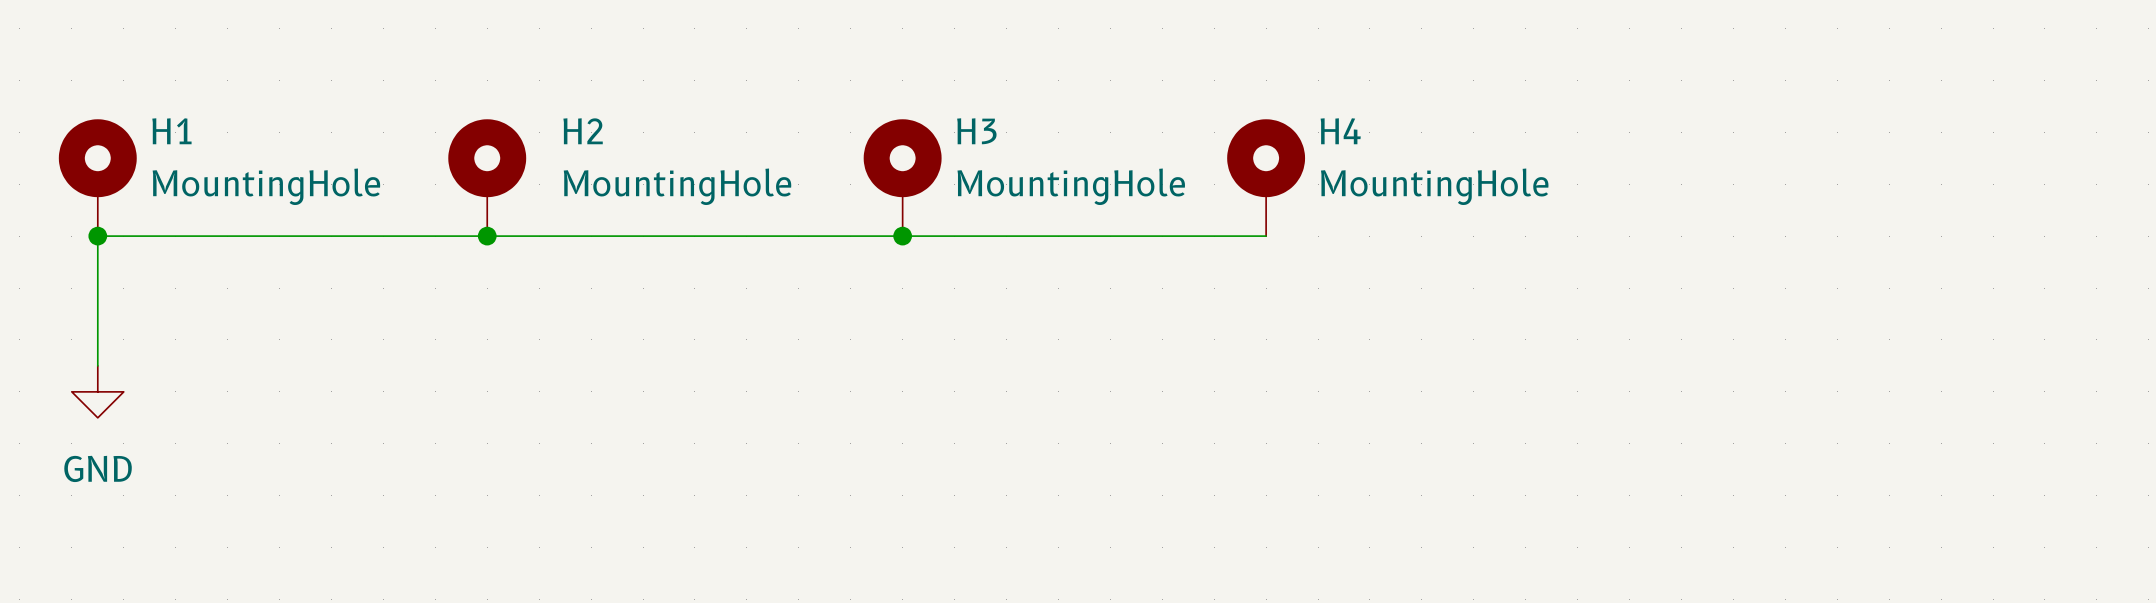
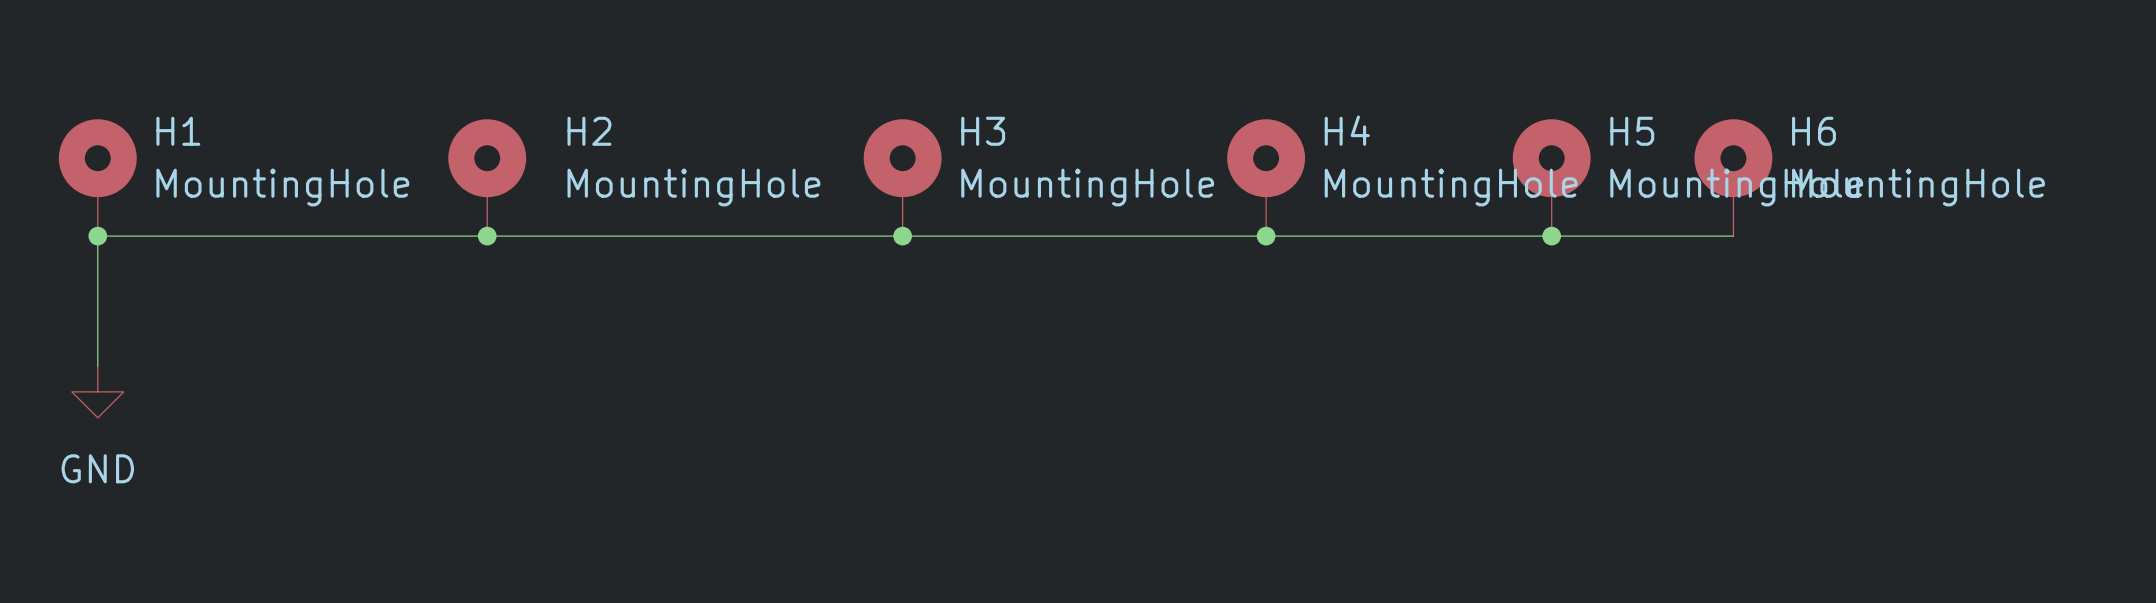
H5: none -> MountingHole (1551, 177)
H6: none -> MountingHole (1733, 177)
wire: none -> (1266, 236) (1733, 236)
junction: none -> (1266, 236)
junction: none -> (1551, 236)

